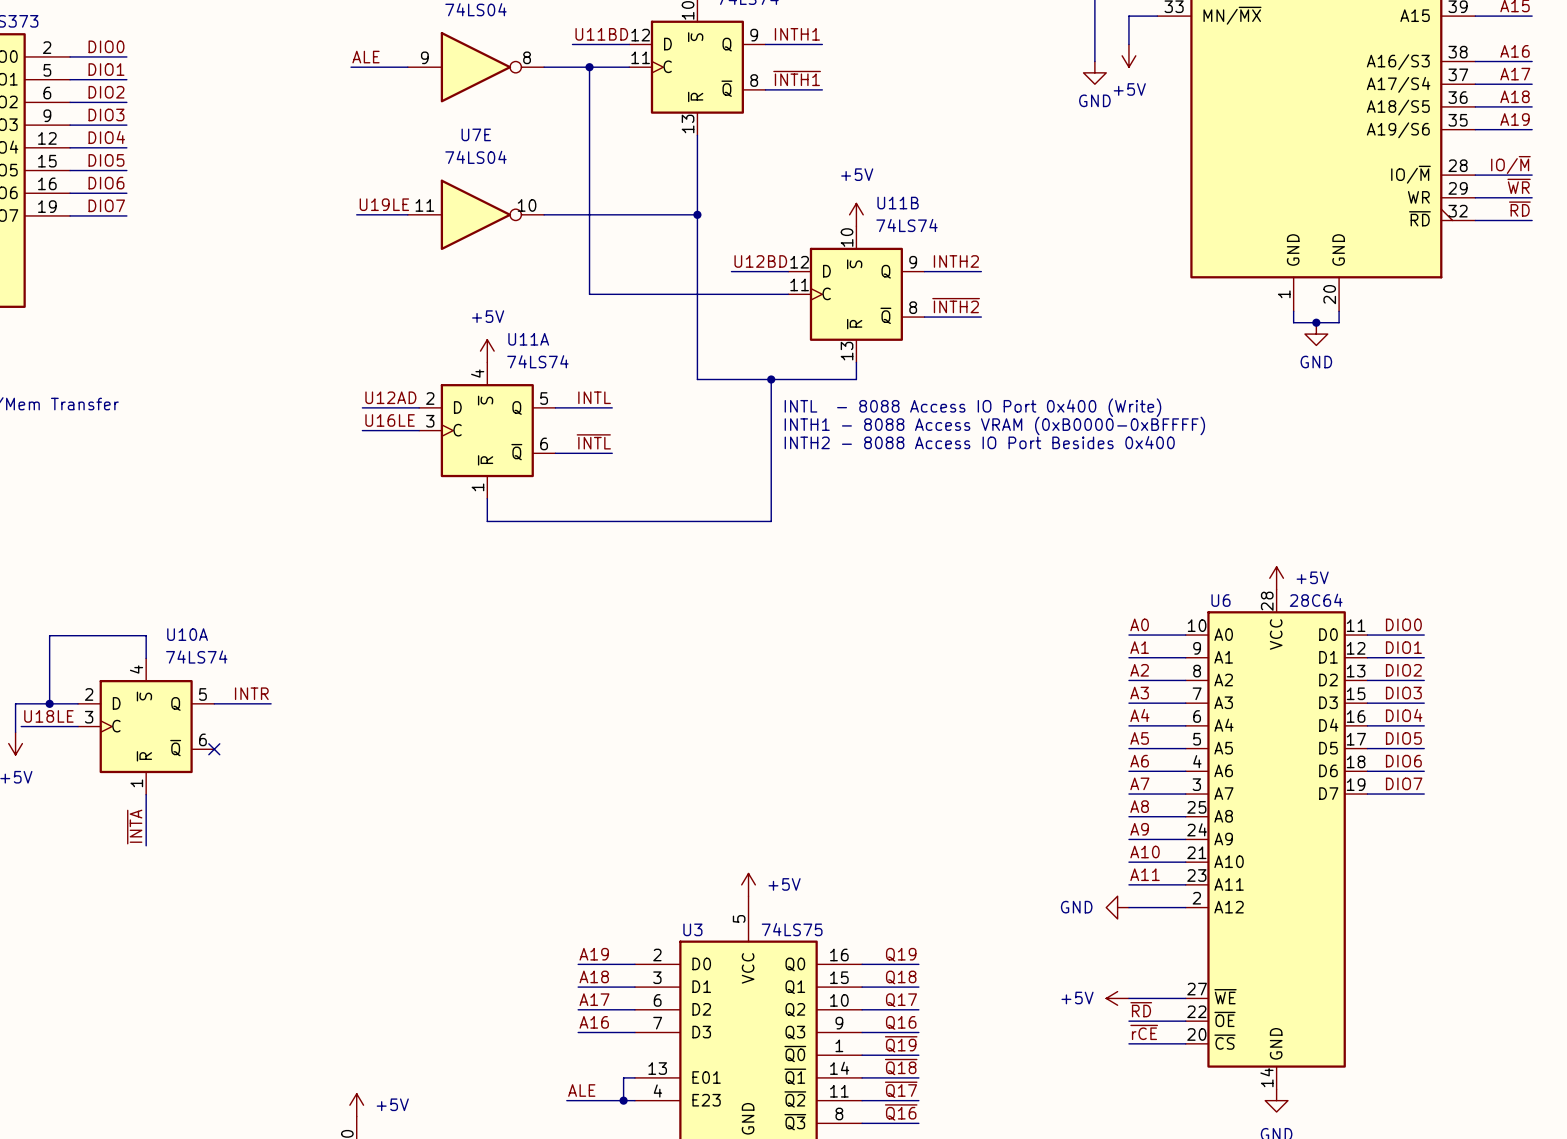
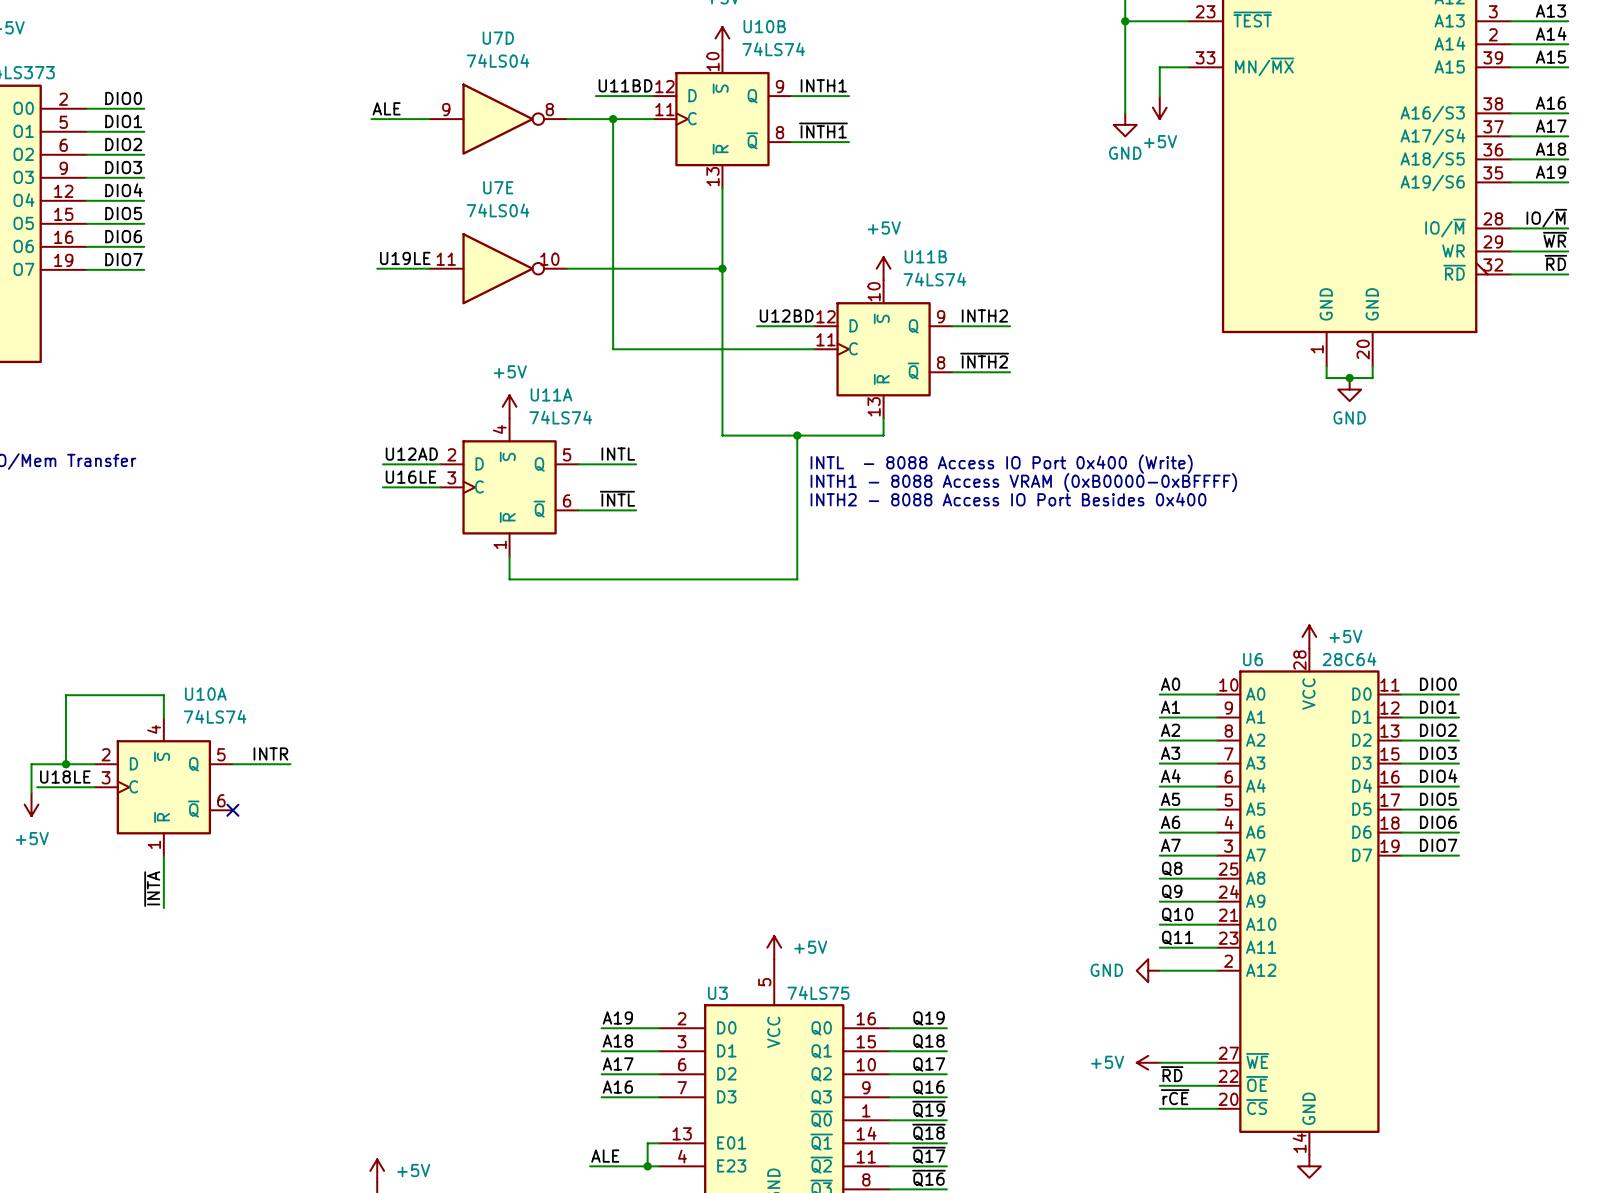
label: A8 (1139, 806) -> Q8 (1172, 868)
label: A9 (1139, 829) -> Q9 (1172, 891)
label: A10 (1145, 852) -> Q10 (1177, 914)
label: A11 (1145, 874) -> Q11 (1177, 937)

